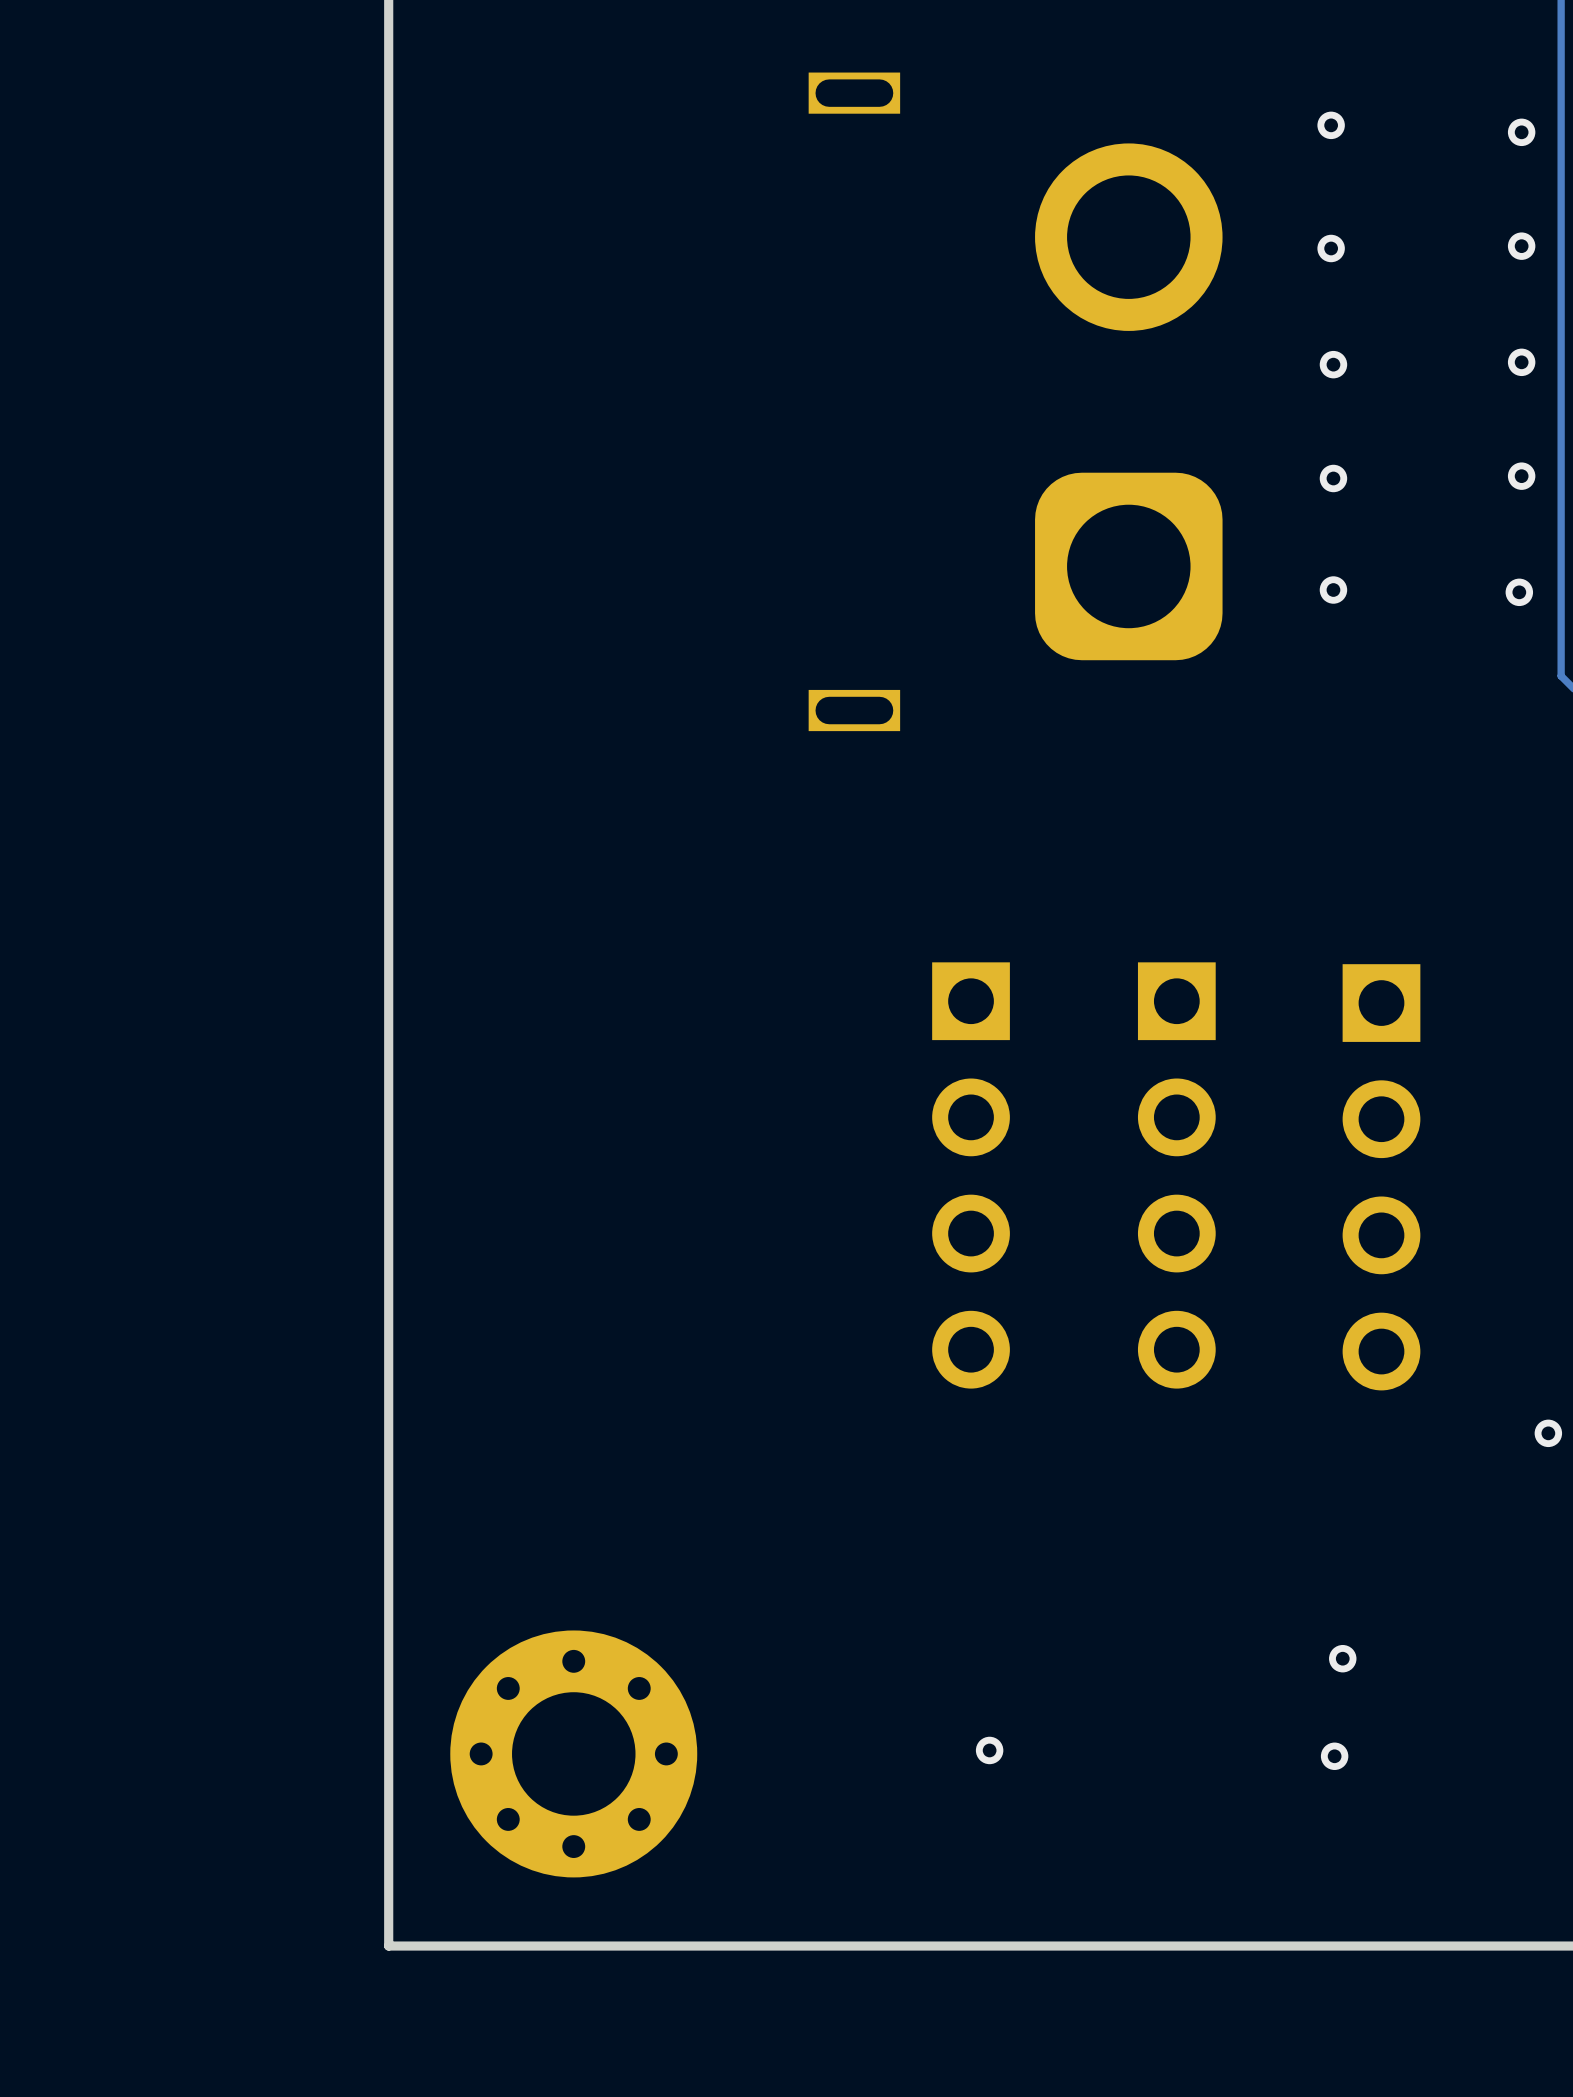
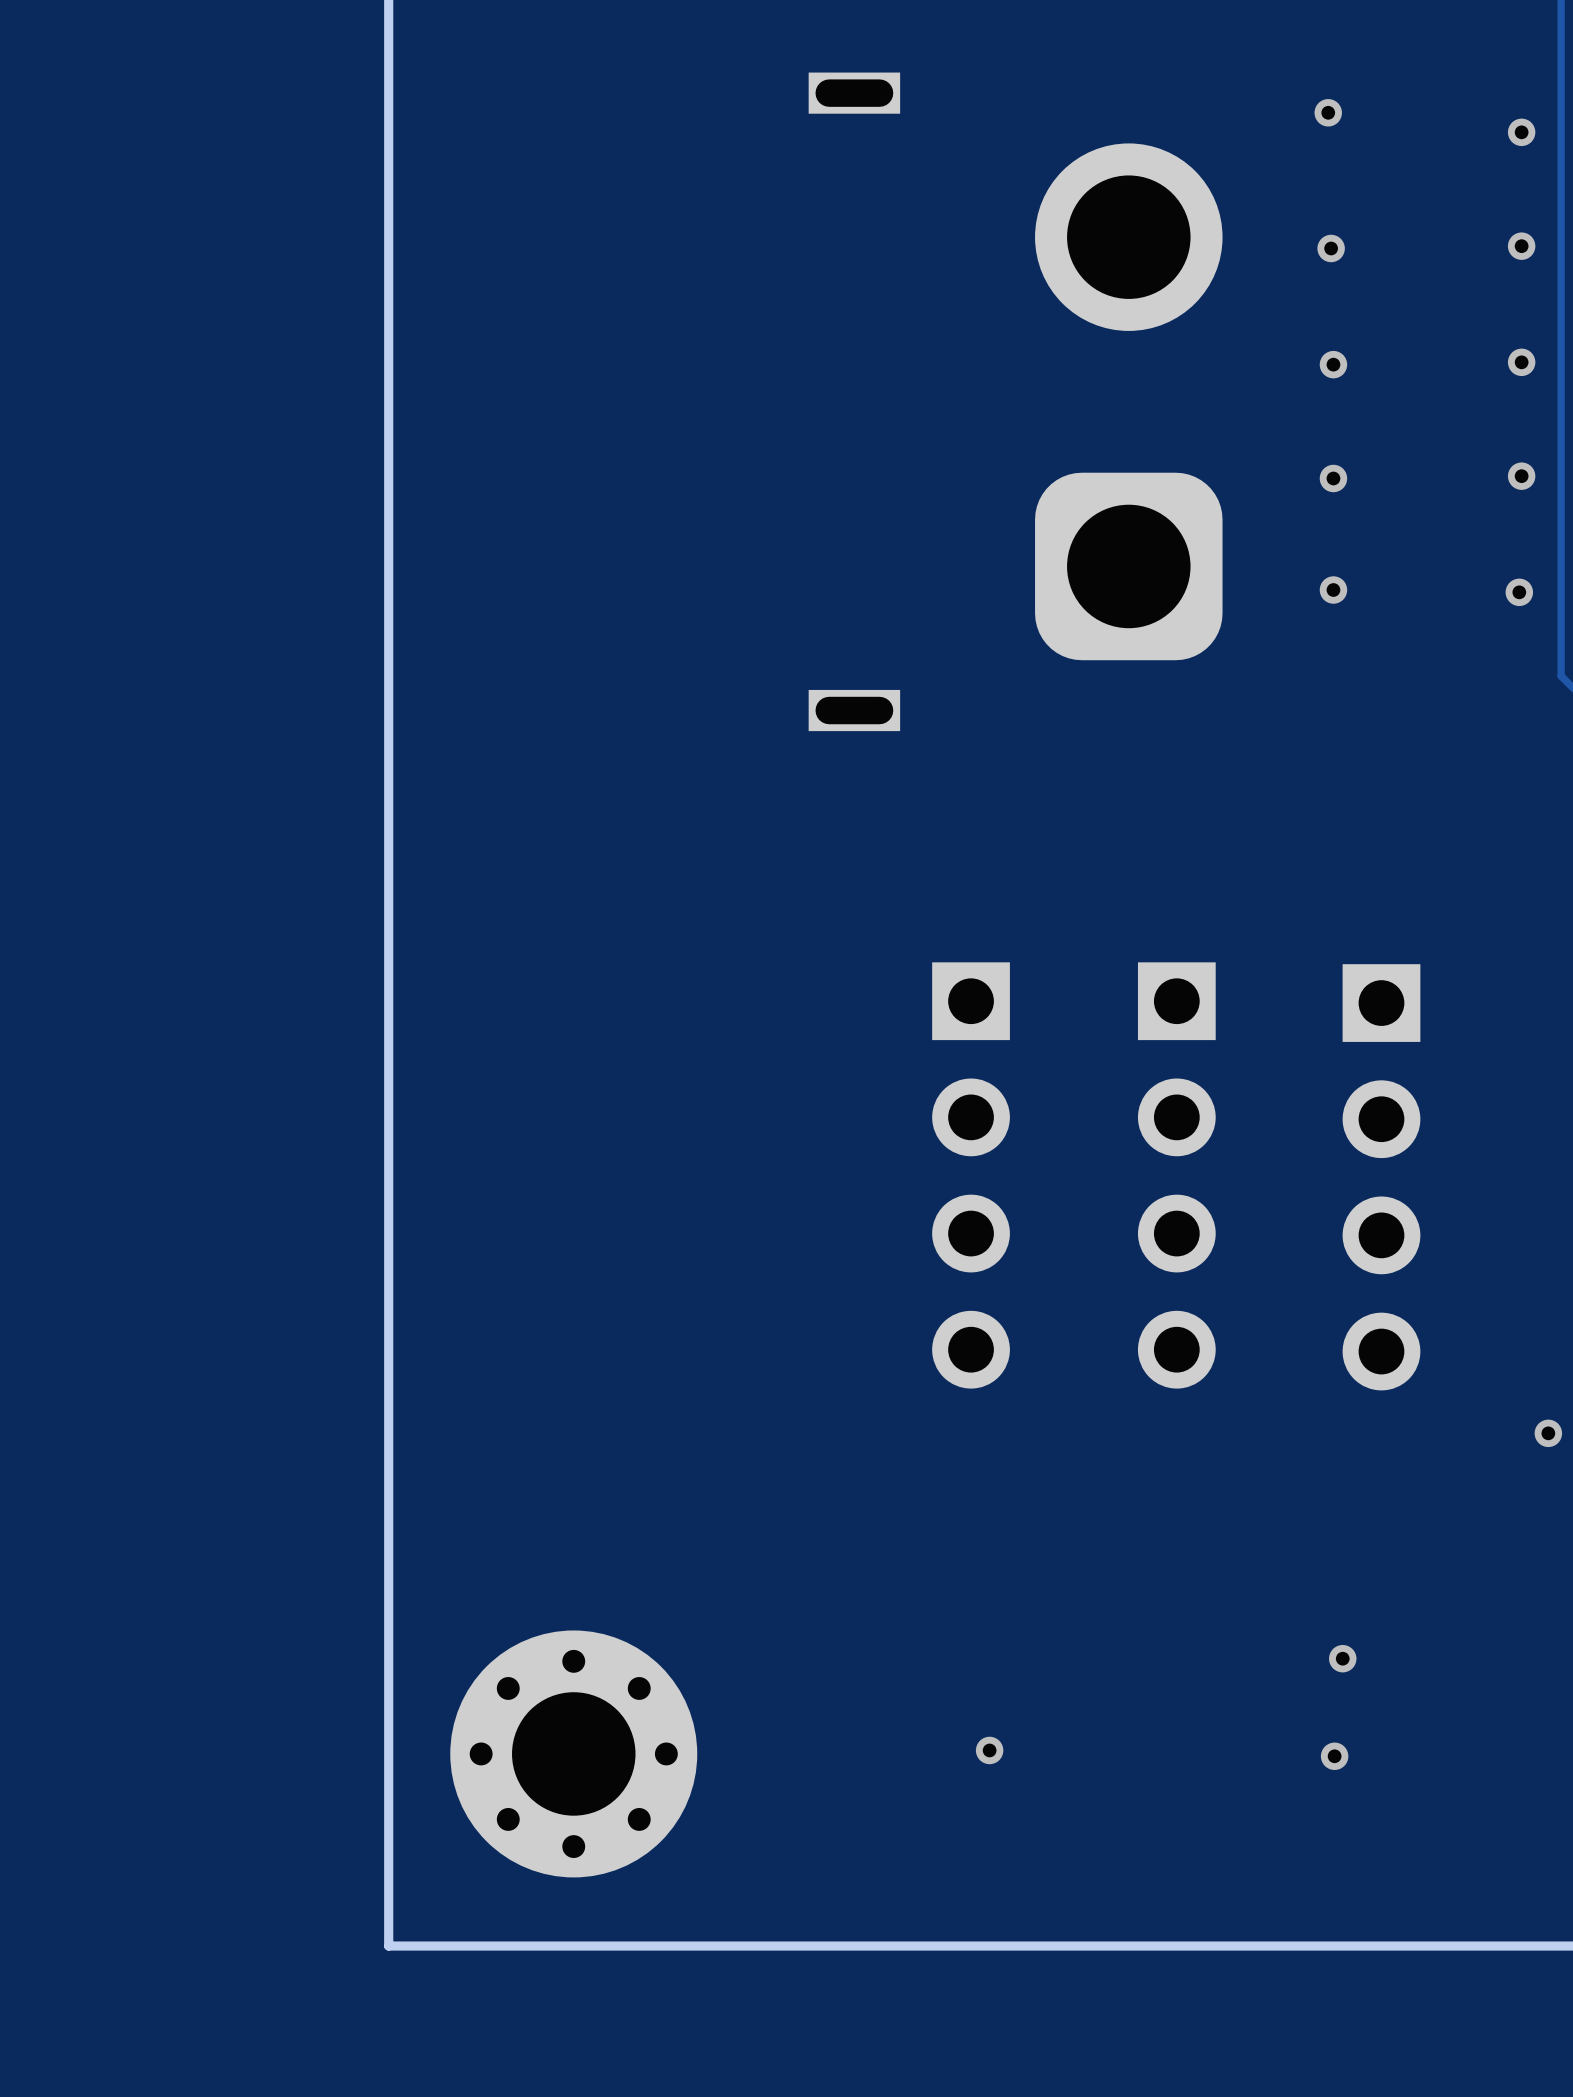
via position: (1331, 125) -> (1328, 112)

